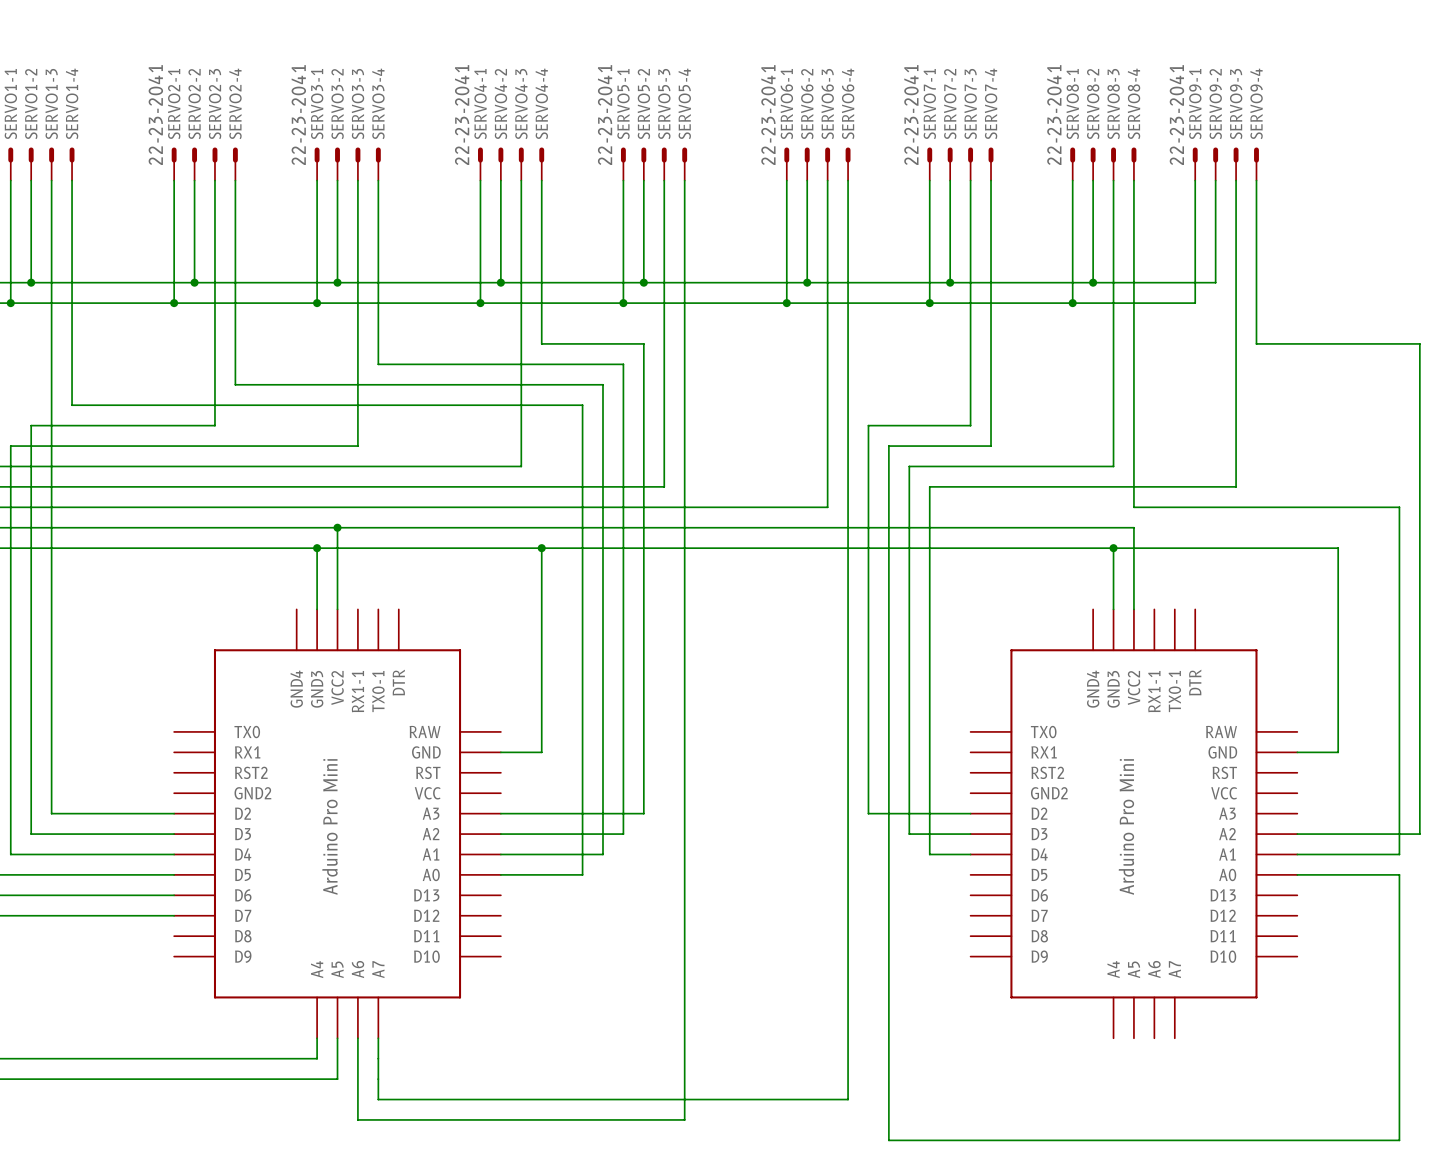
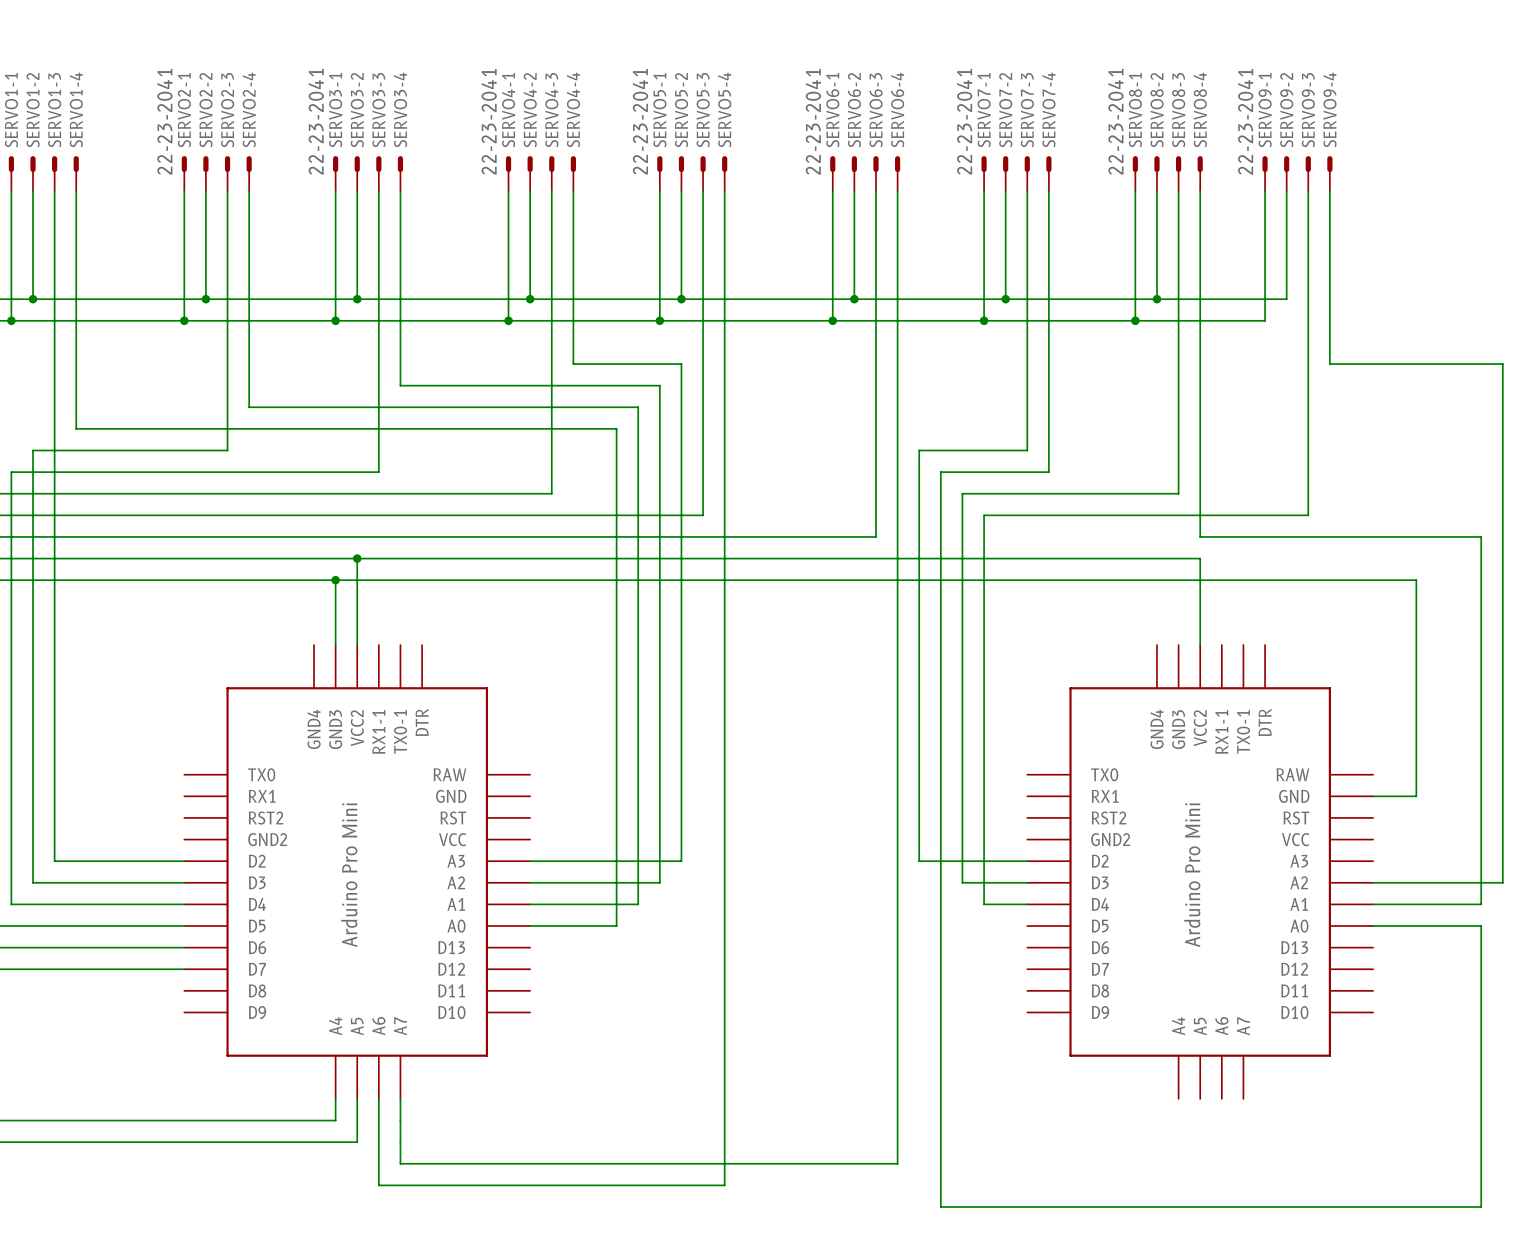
wire: (541, 548) (541, 752) (500, 752) -> none
junction: (541, 548) -> none
wire: (1113, 548) (1113, 609) -> none
junction: (1113, 548) -> none

